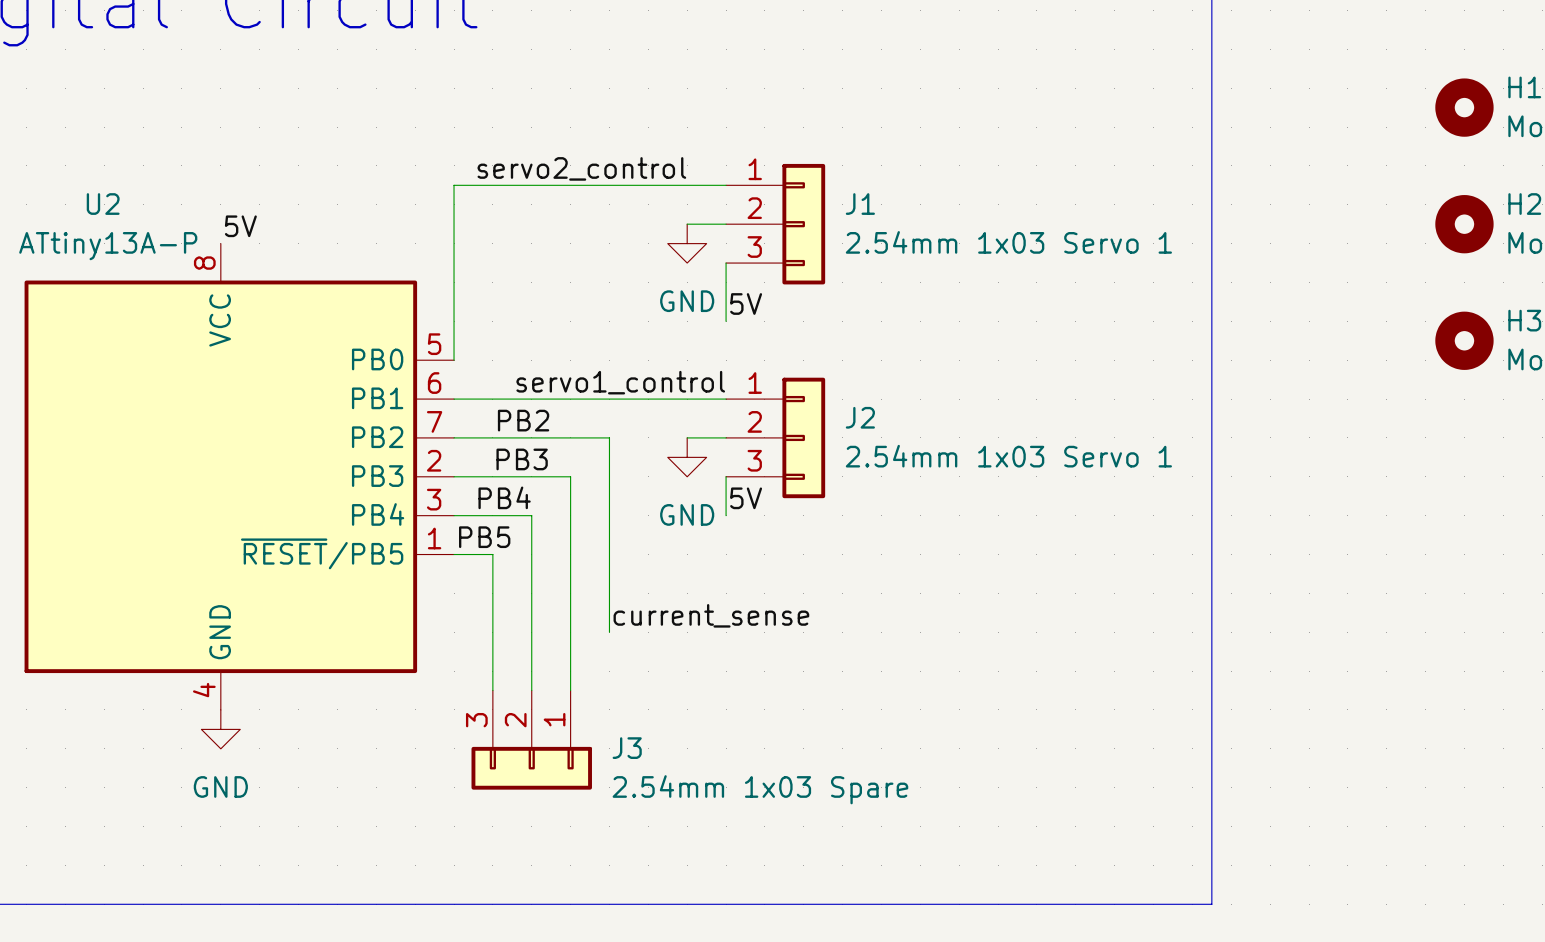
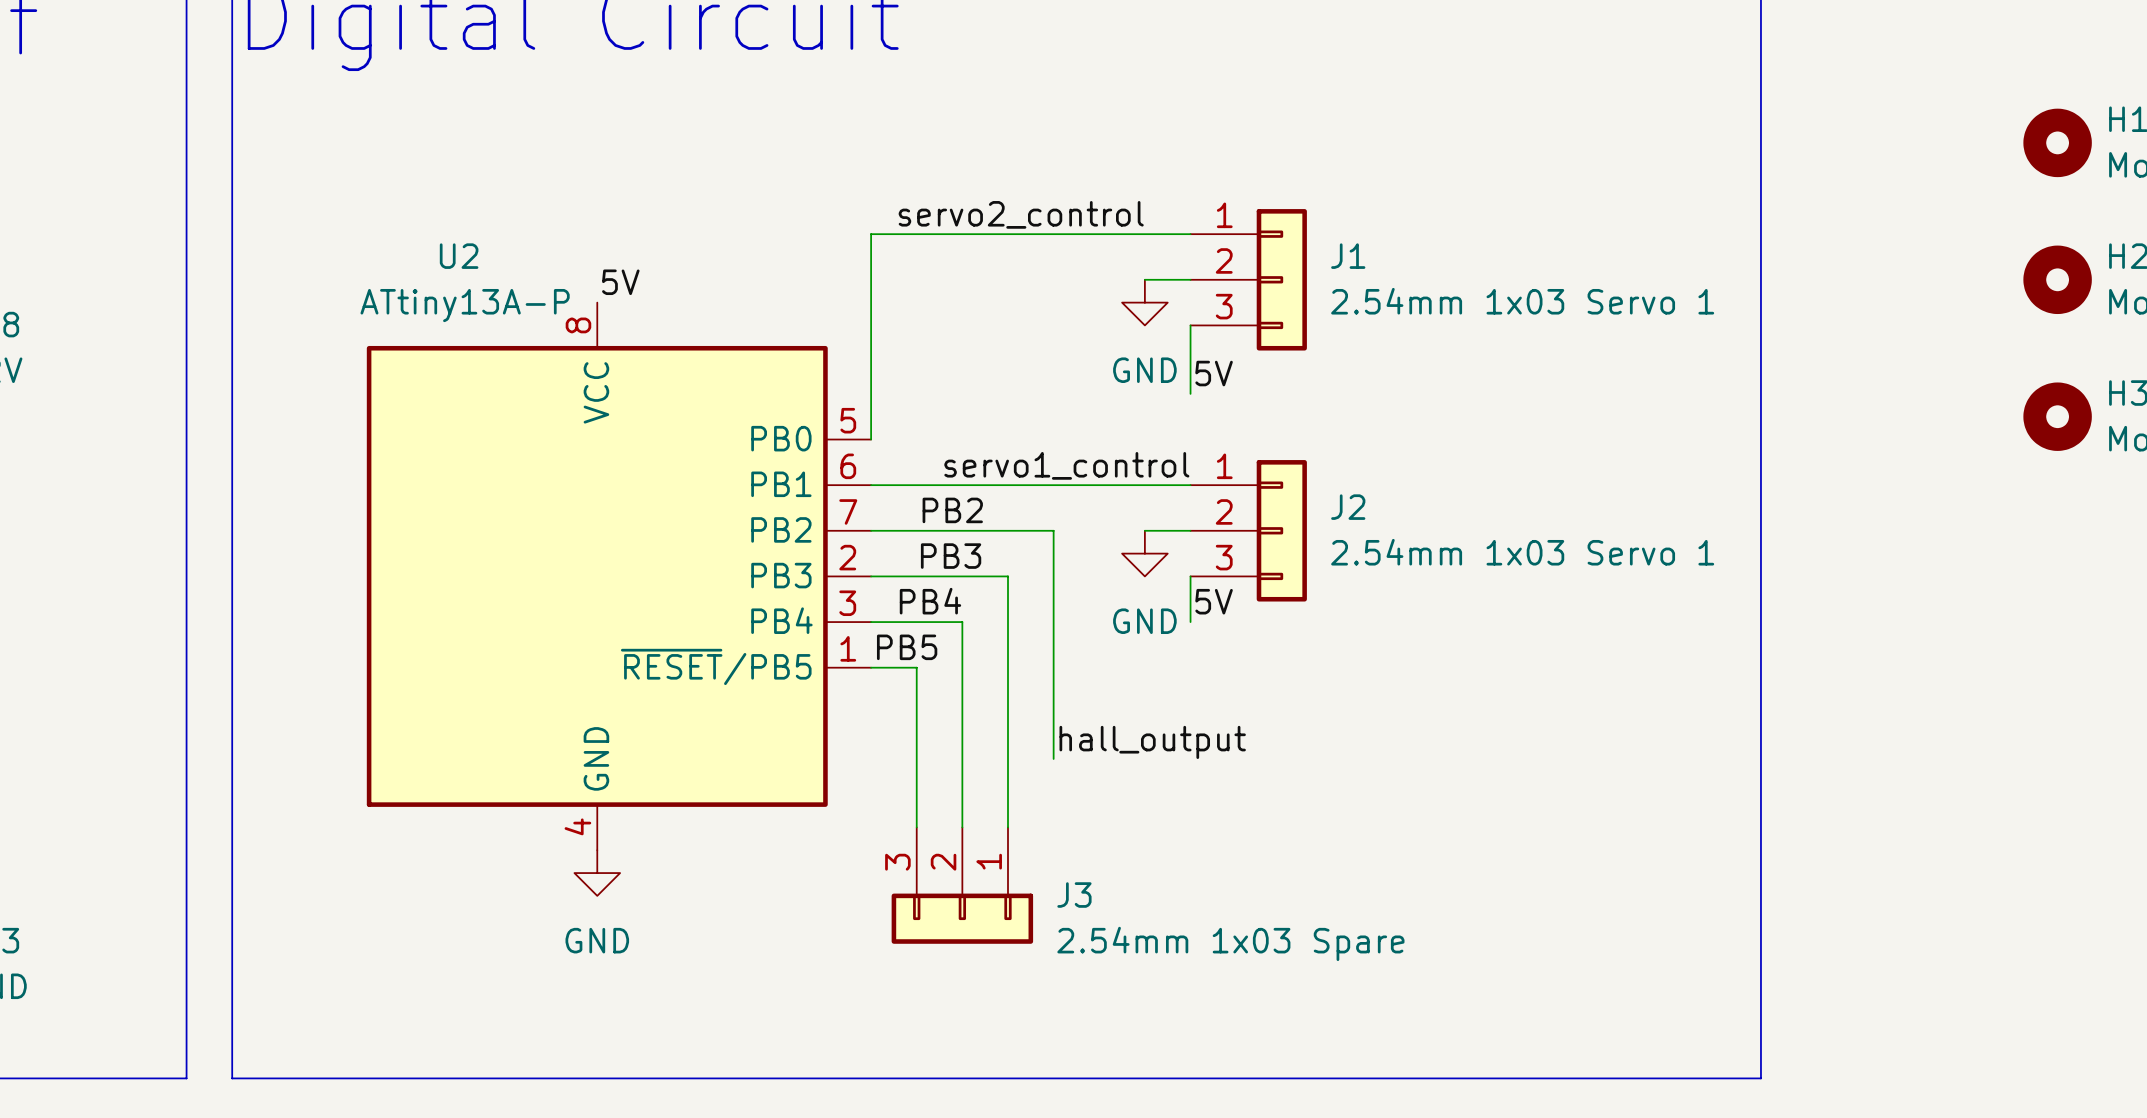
label: current_sense (711, 615) -> hall_output (1152, 742)

